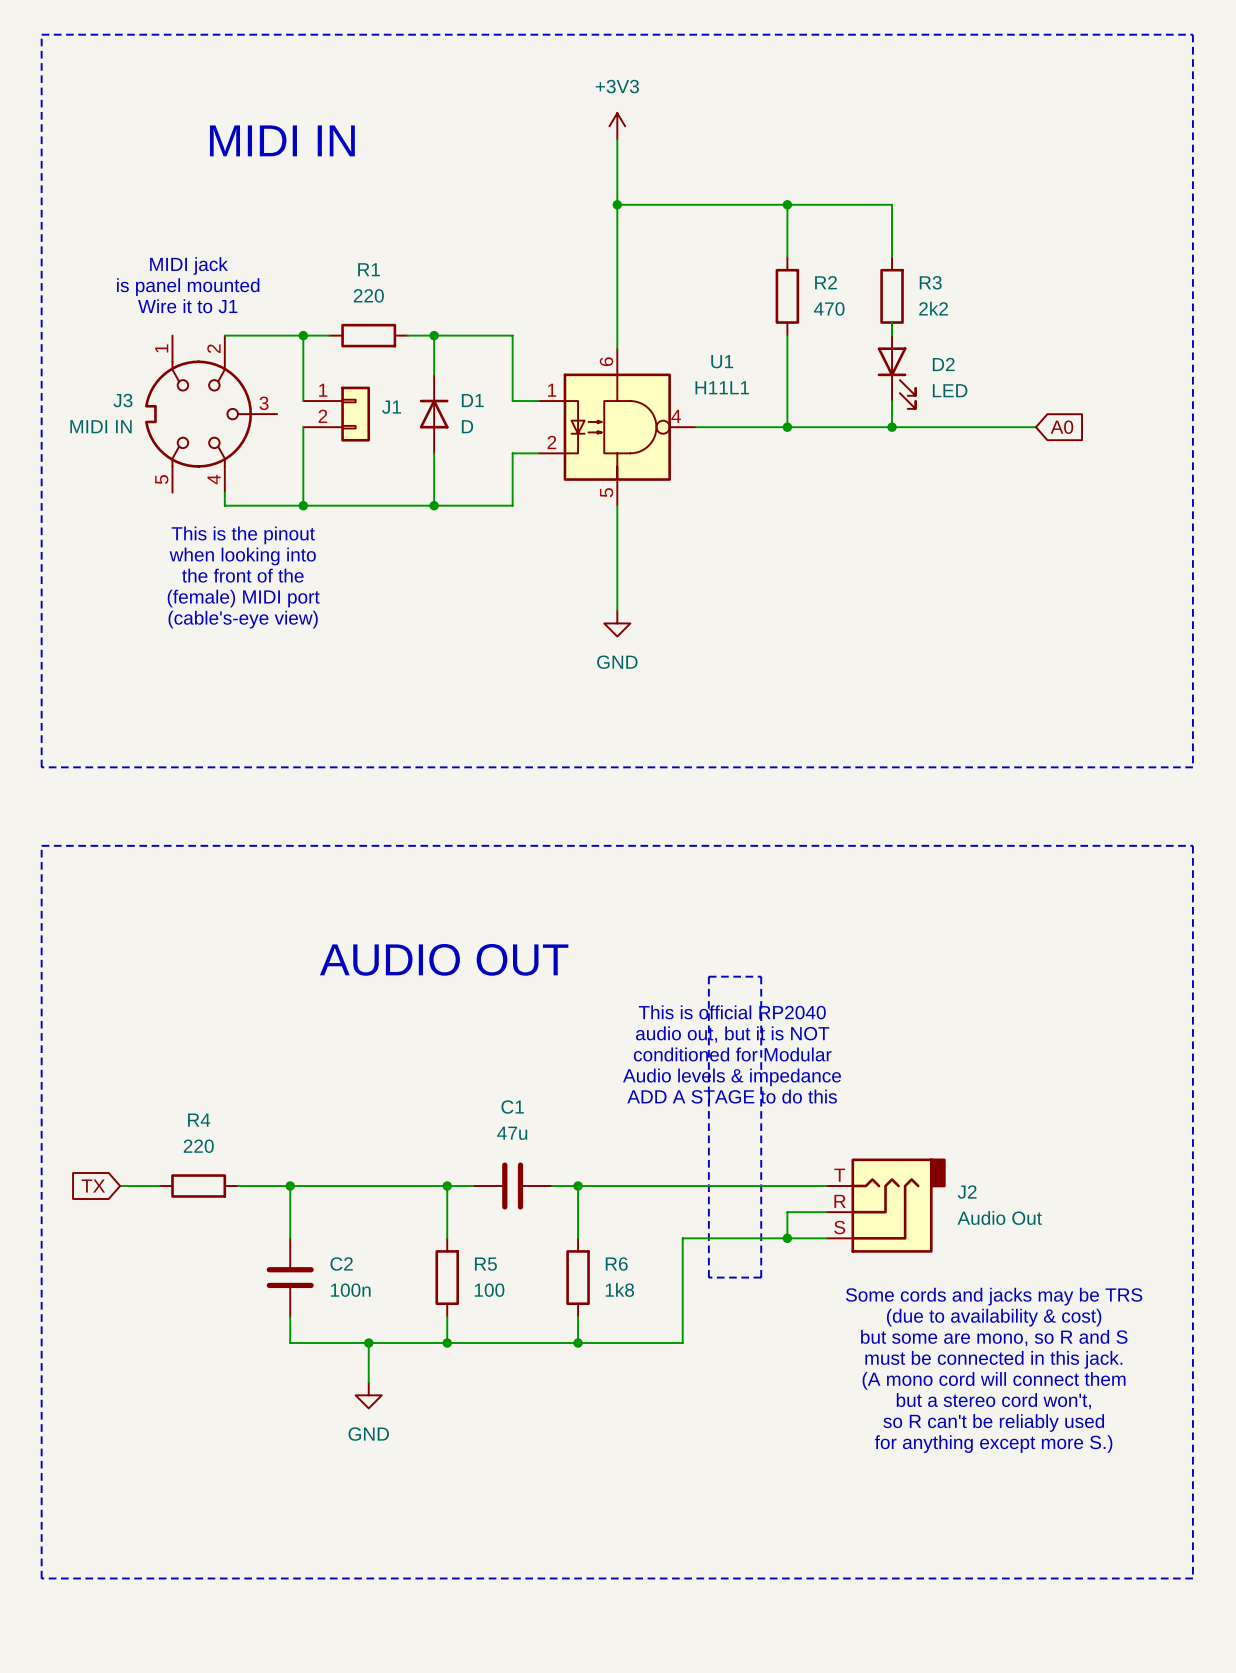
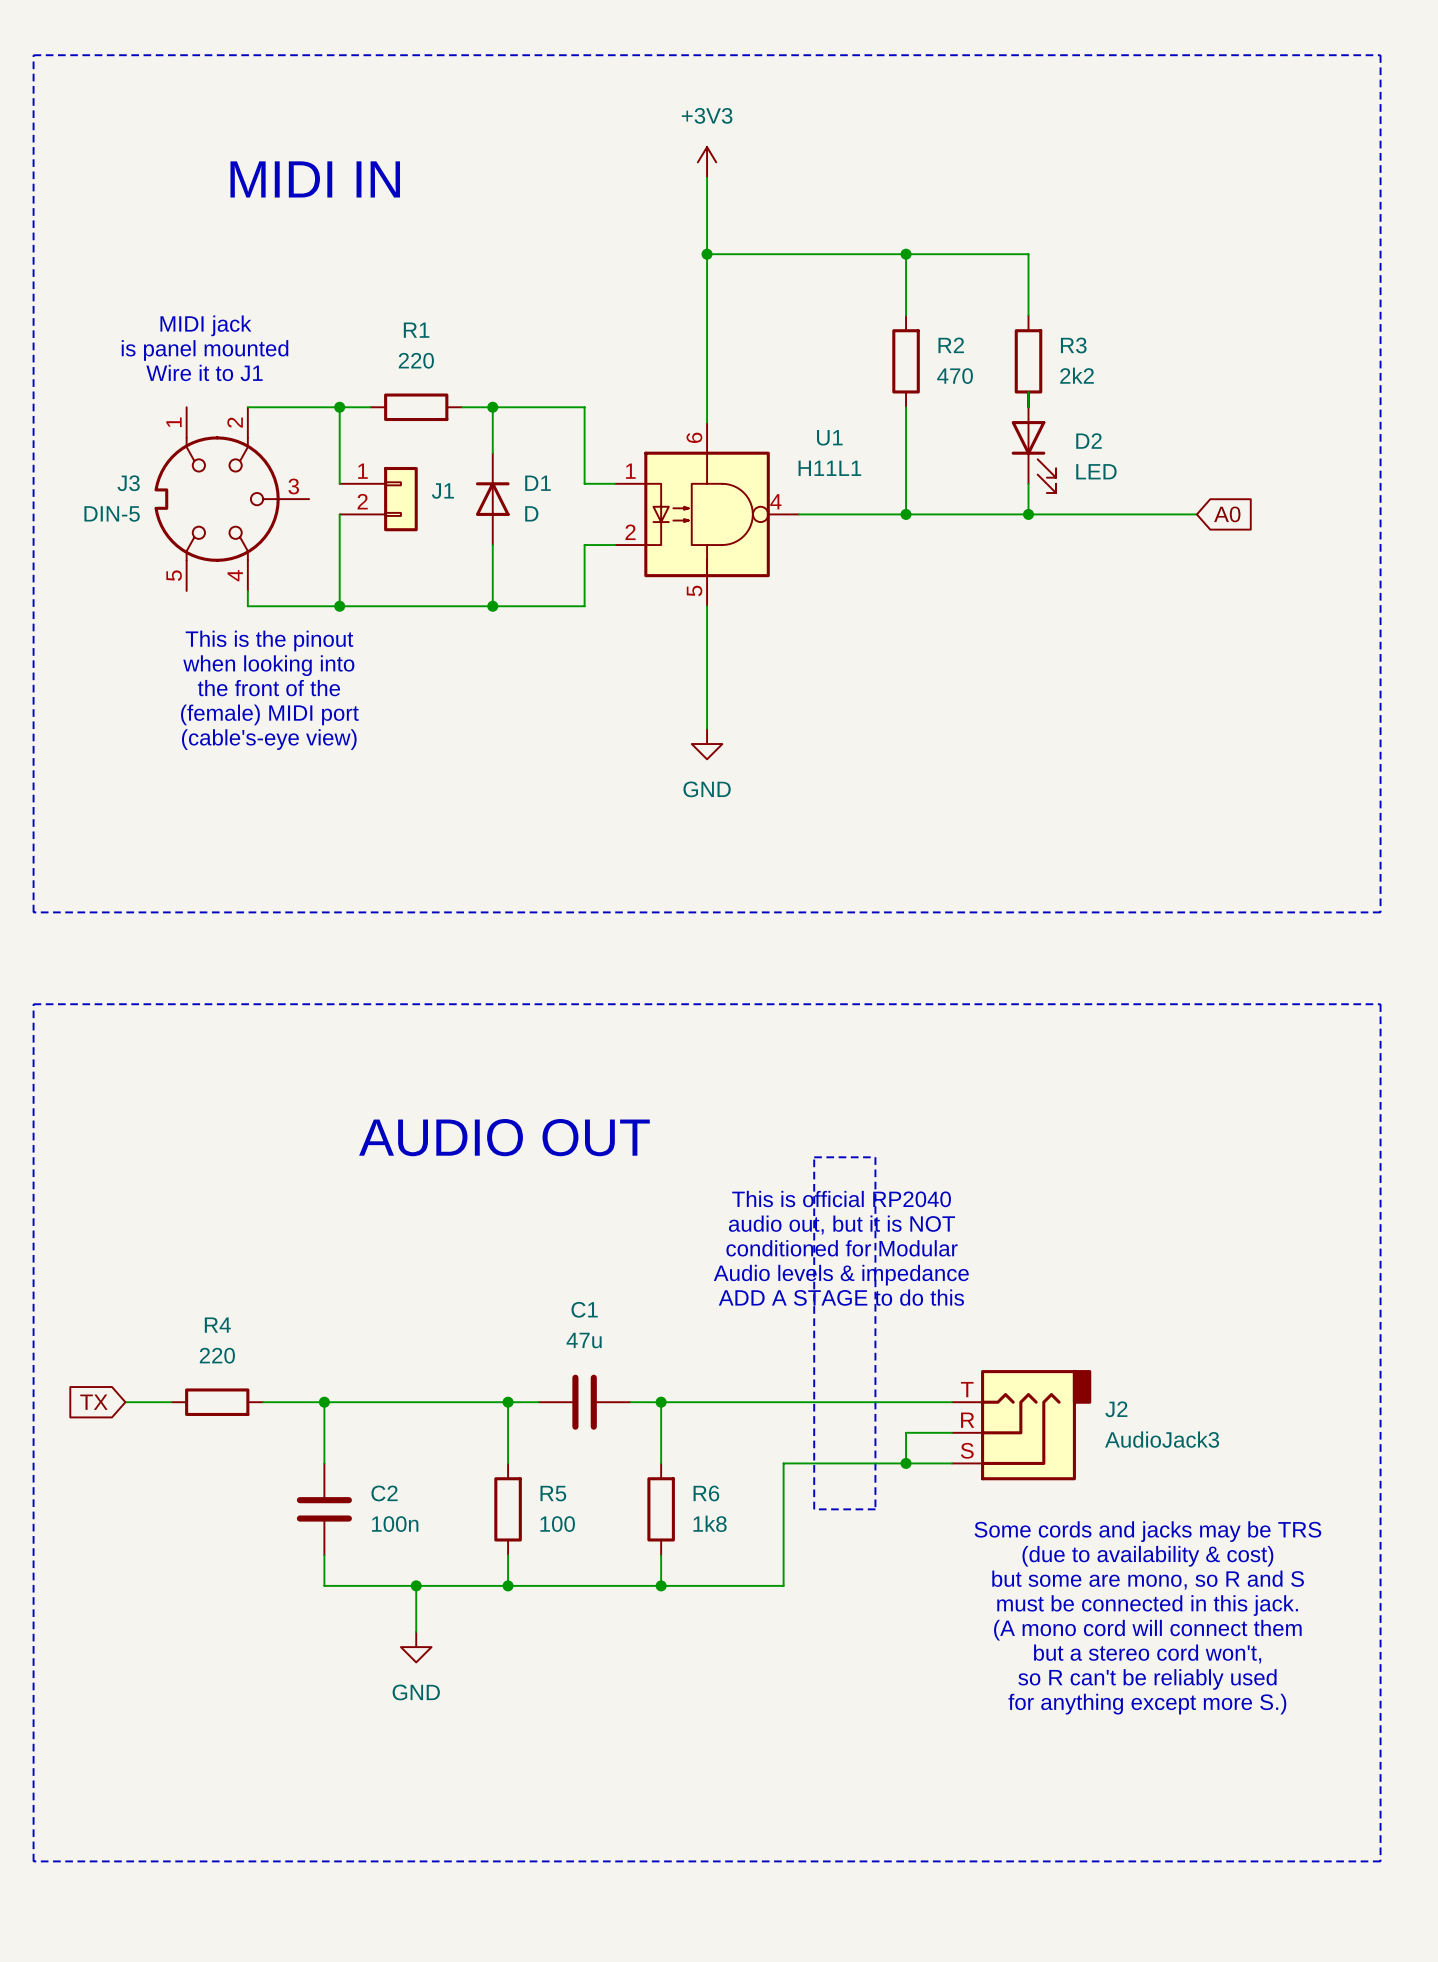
J3 value: MIDI IN (101, 426) -> DIN-5 (112, 513)
J2 value: Audio Out (999, 1217) -> AudioJack3 (1162, 1439)

